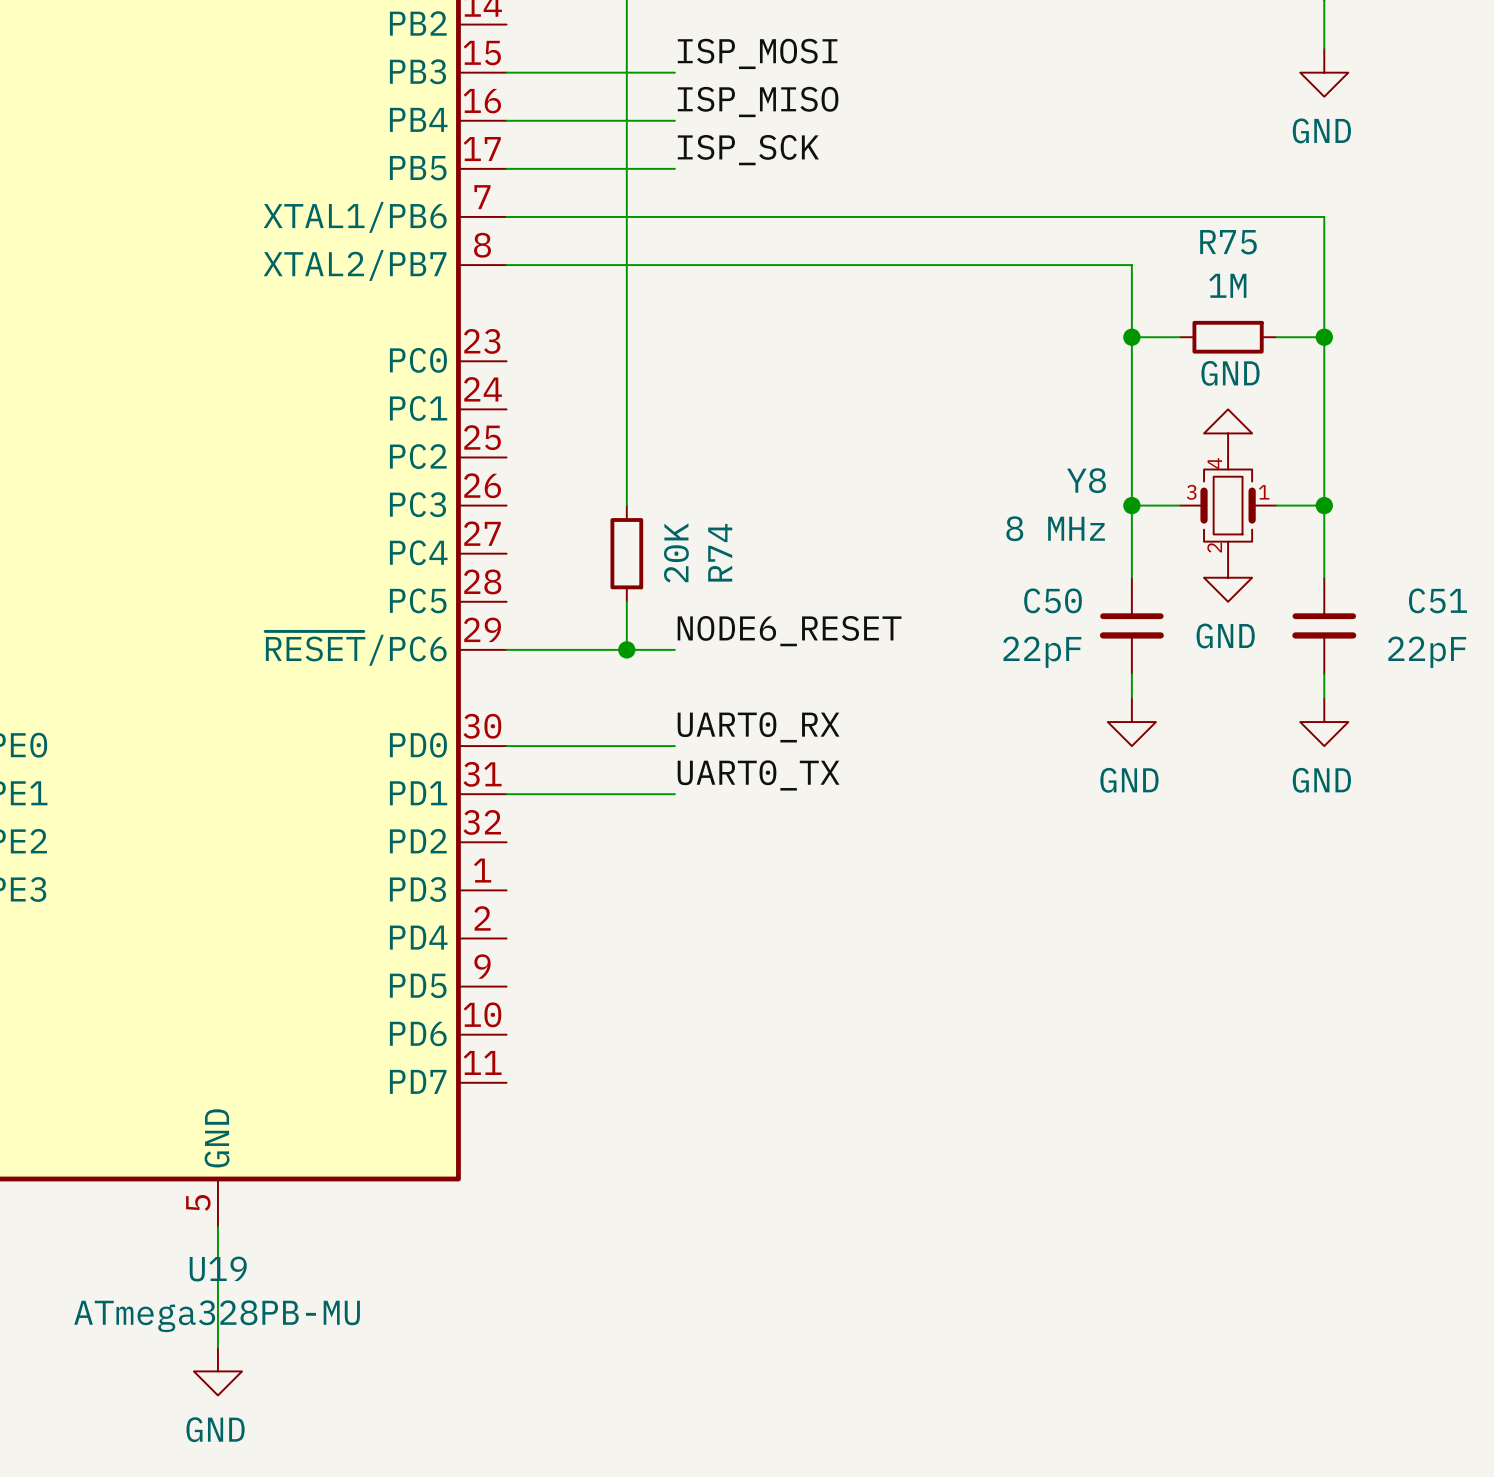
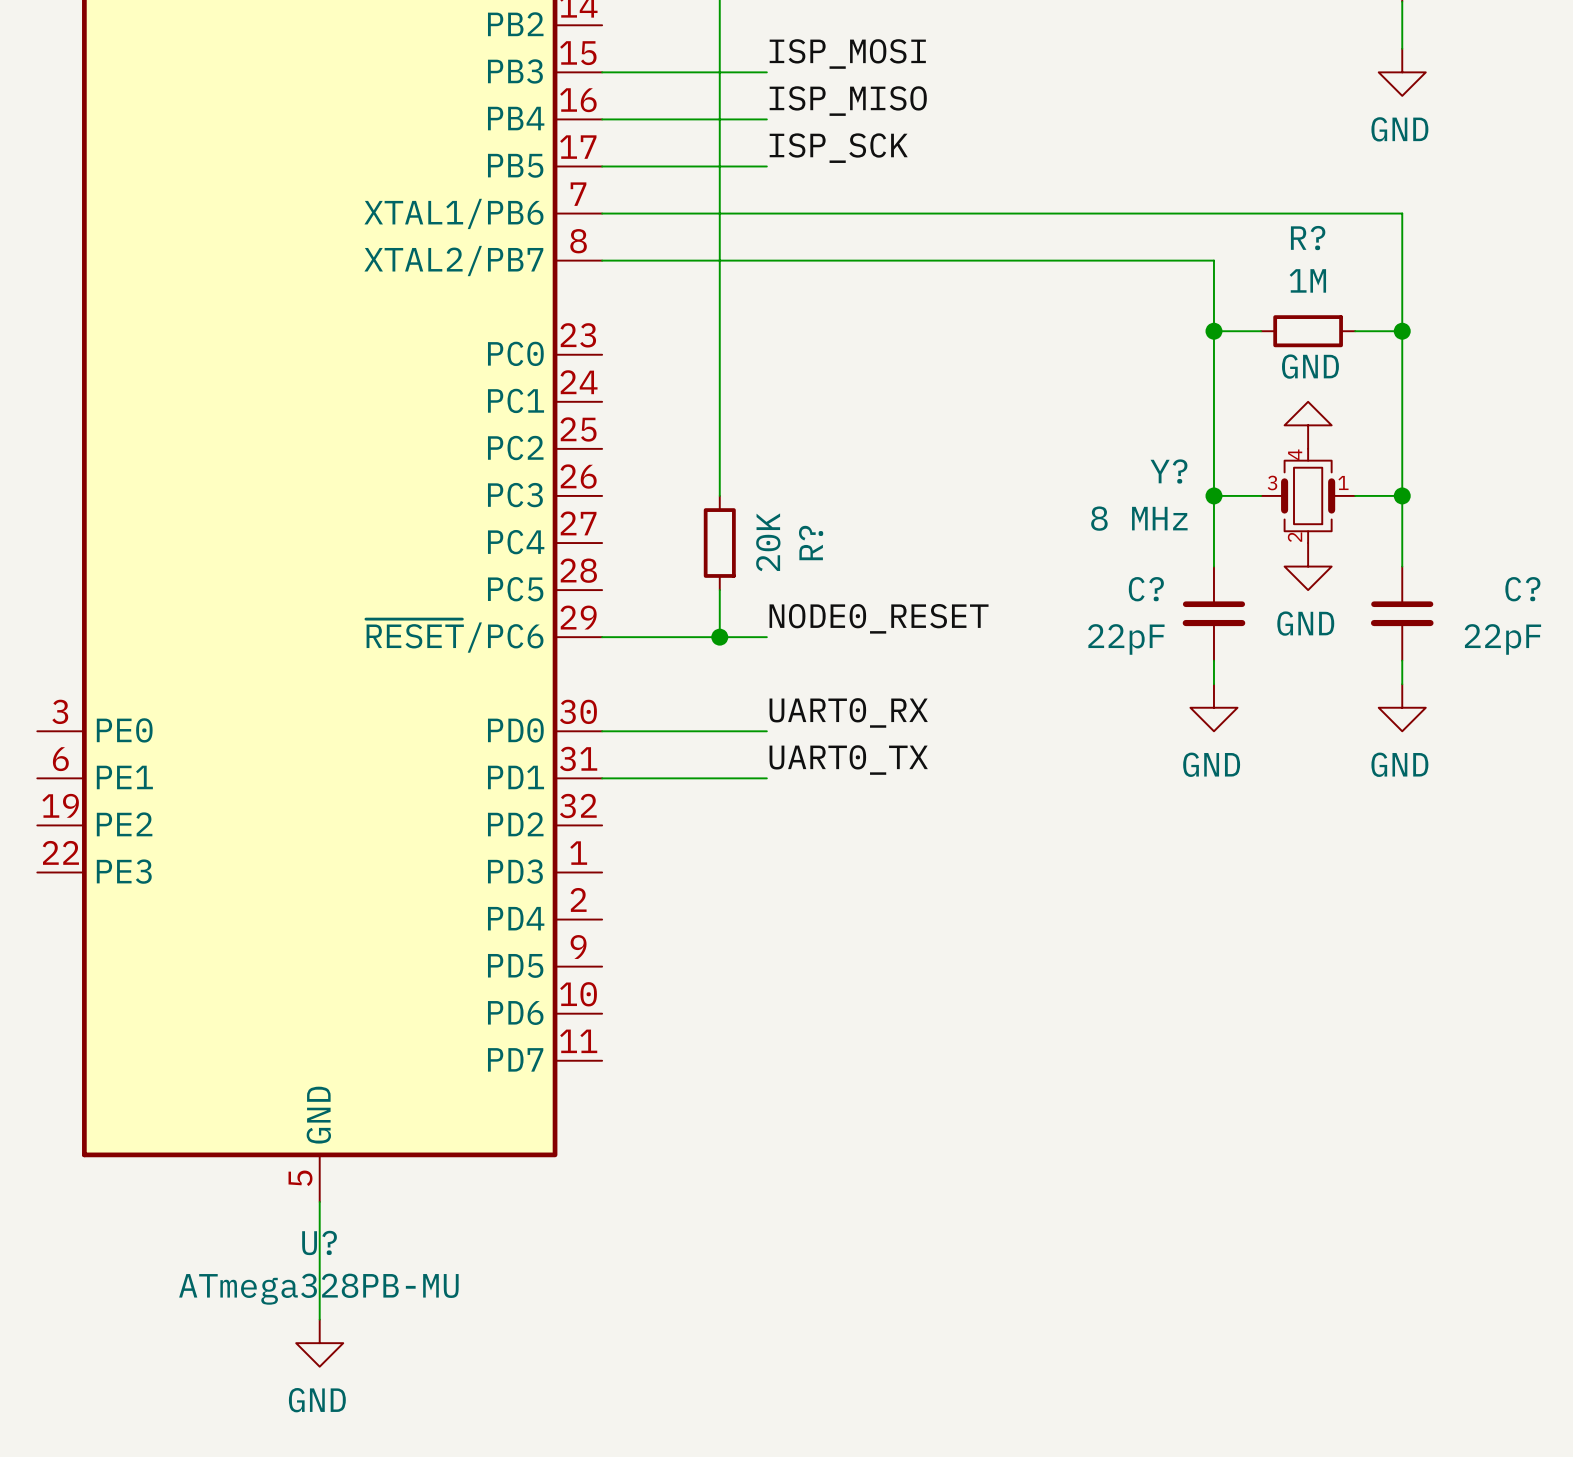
R75 name: R75 (1228, 242) -> R? (1308, 238)
Y8 name: Y8 (1086, 480) -> Y? (1168, 471)
R74 name: R74 (720, 552) -> R? (811, 543)
C50 name: C50 (1053, 600) -> C? (1146, 589)
C51 name: C51 (1437, 600) -> C? (1522, 589)
label: NODE6_RESET (789, 631) -> NODE0_RESET (879, 618)
U19 name: U19 (218, 1269) -> U? (319, 1242)

